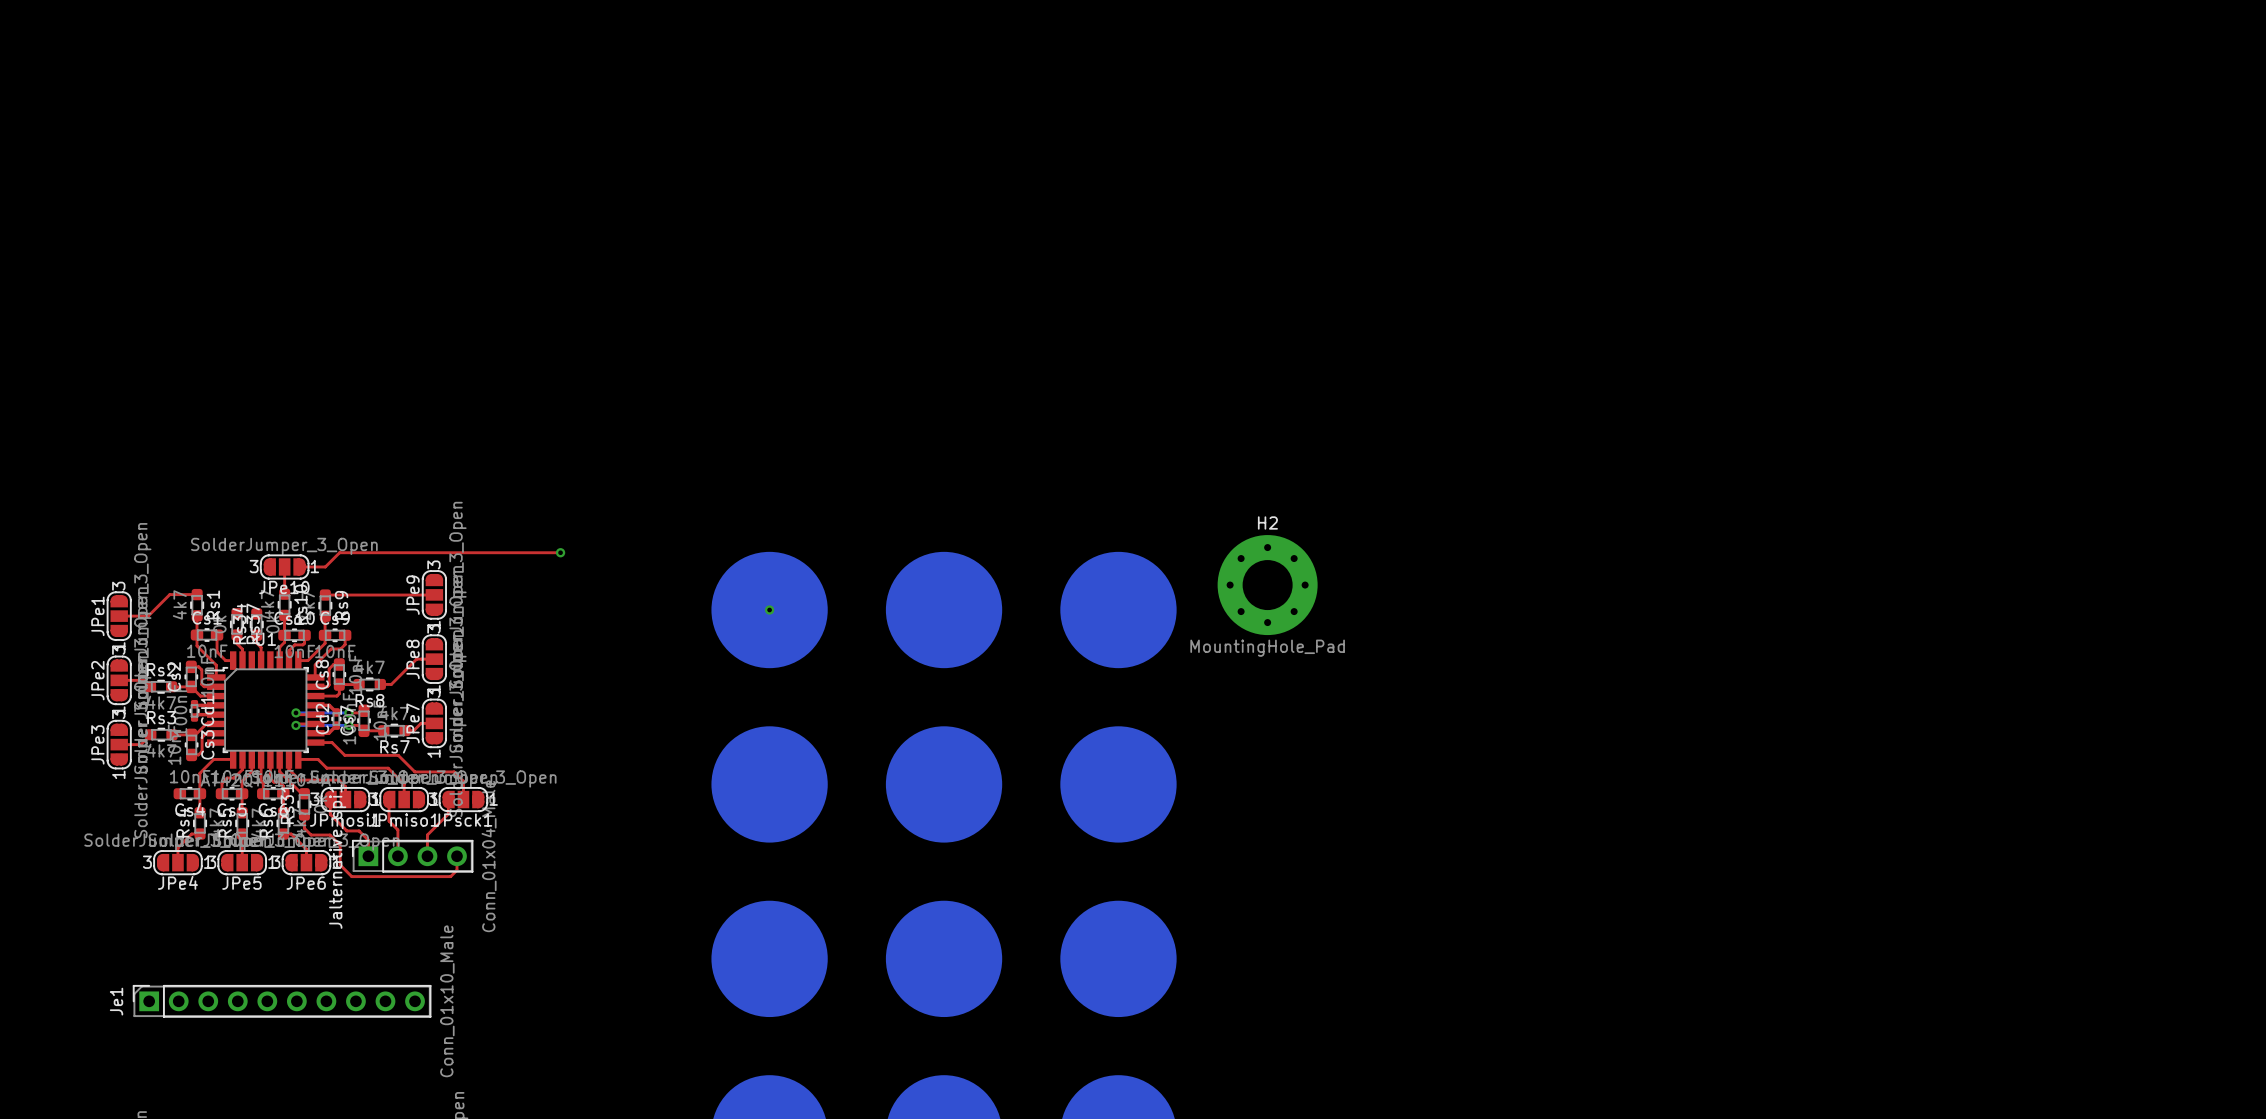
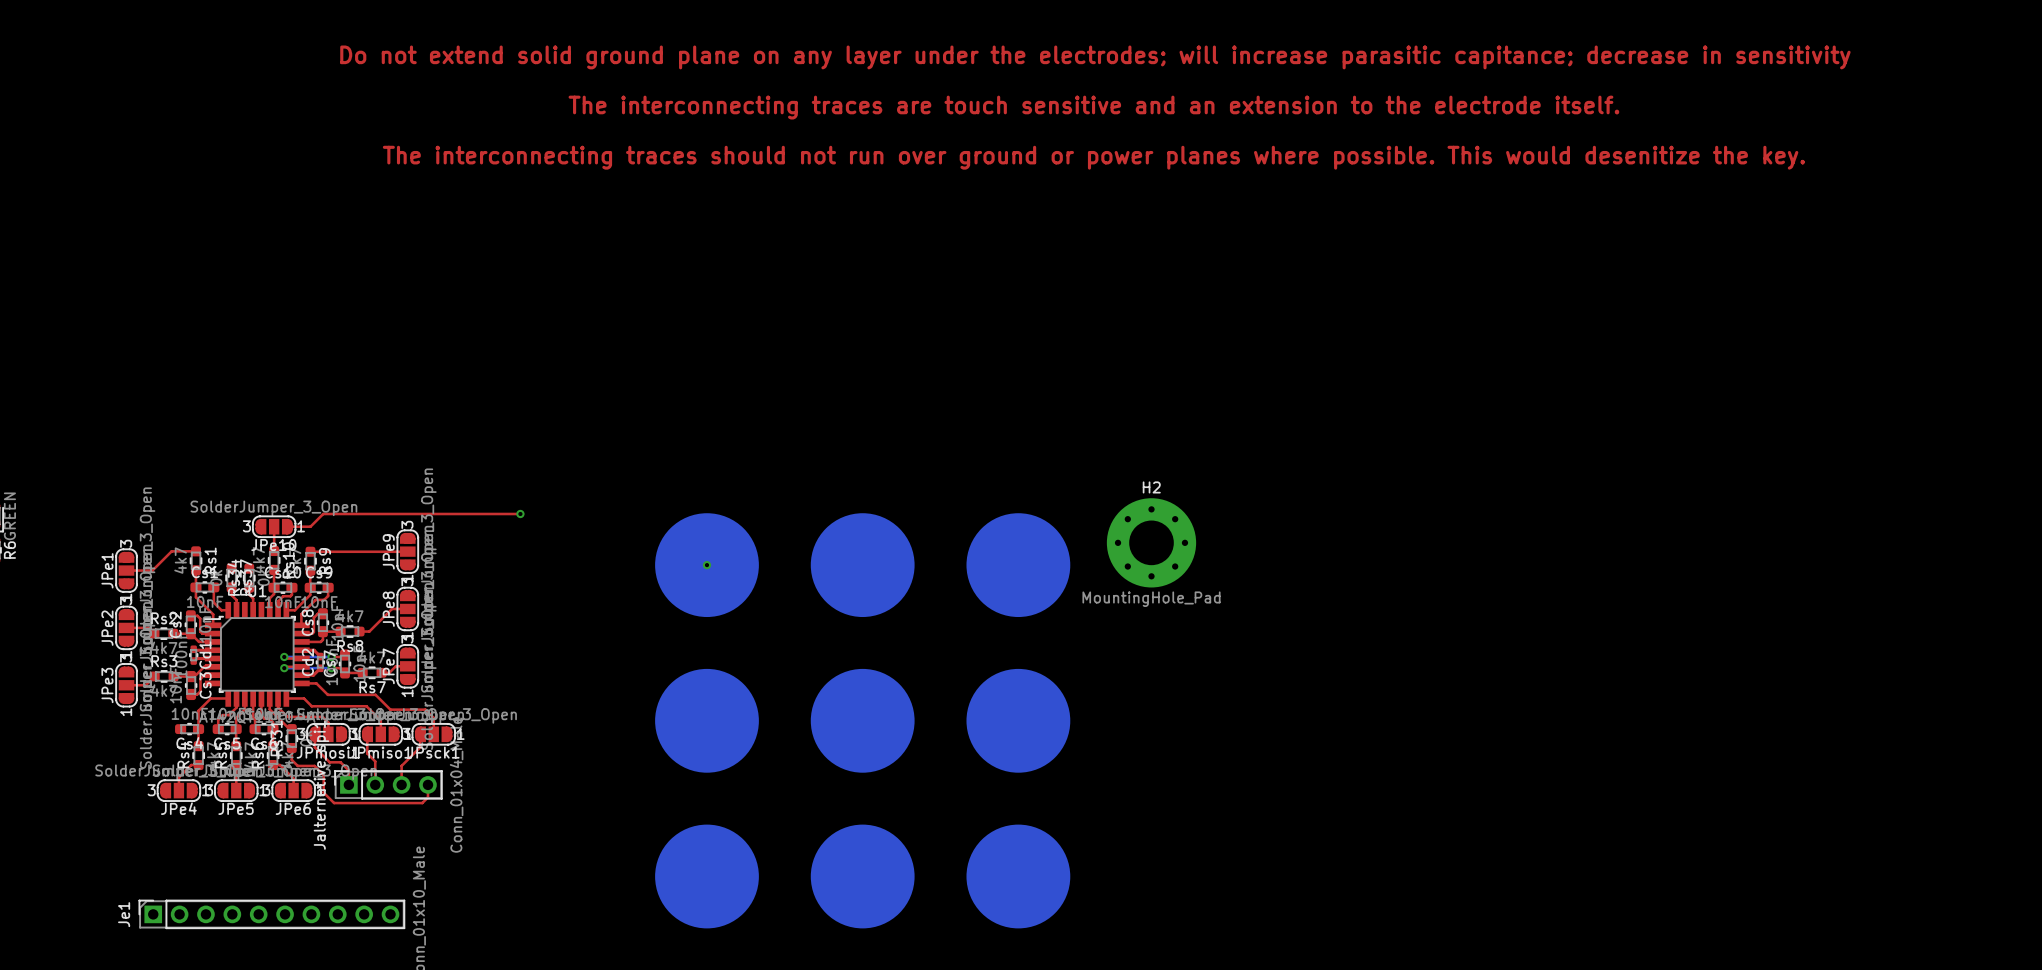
text: none -> Do not extend solid ground plane on any layer under the electrodes; will increase parasitic capitance; decrease in sensitivity (1095, 57)
text: none -> The interconnecting traces are touch sensitive and an extension to the electrode itself. (1093, 107)
text: none -> The interconnecting traces should not run over ground or power planes where possible. This would desenitize the key. (1093, 157)

